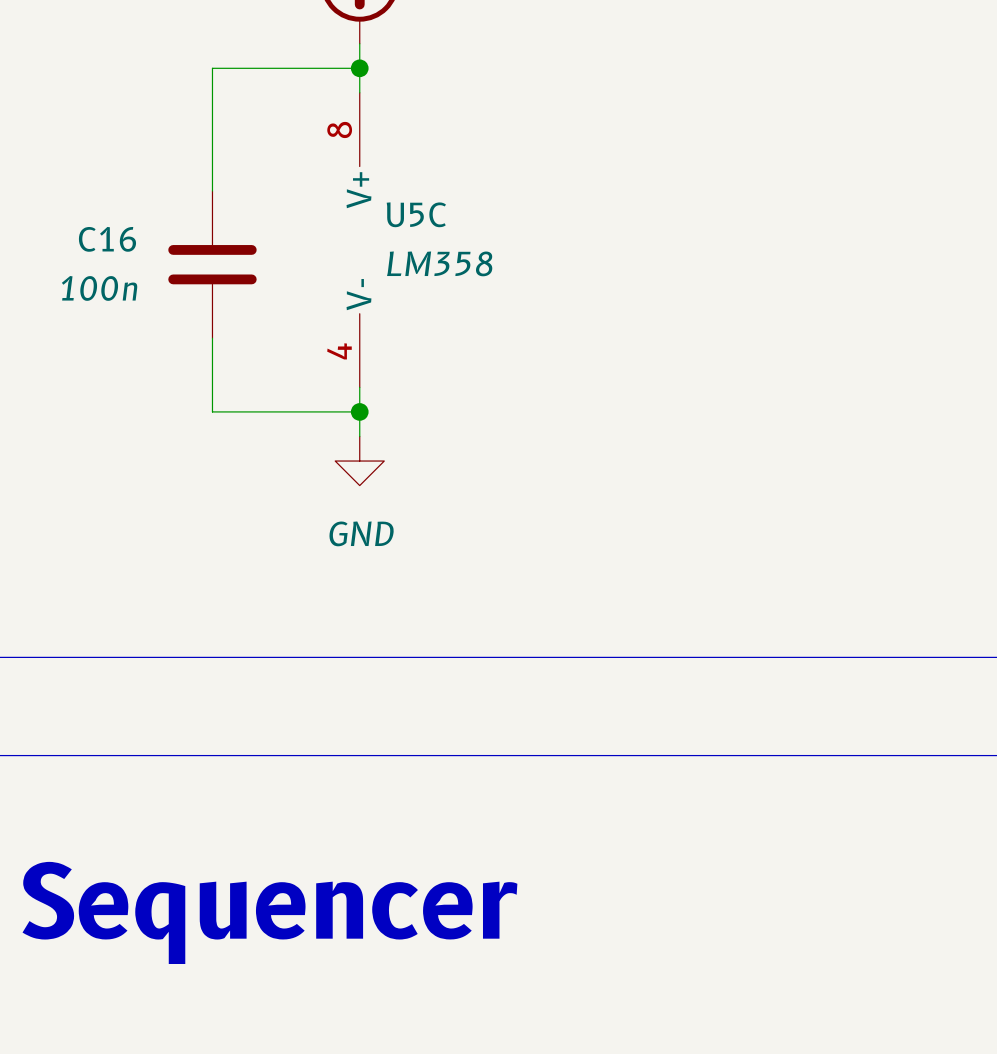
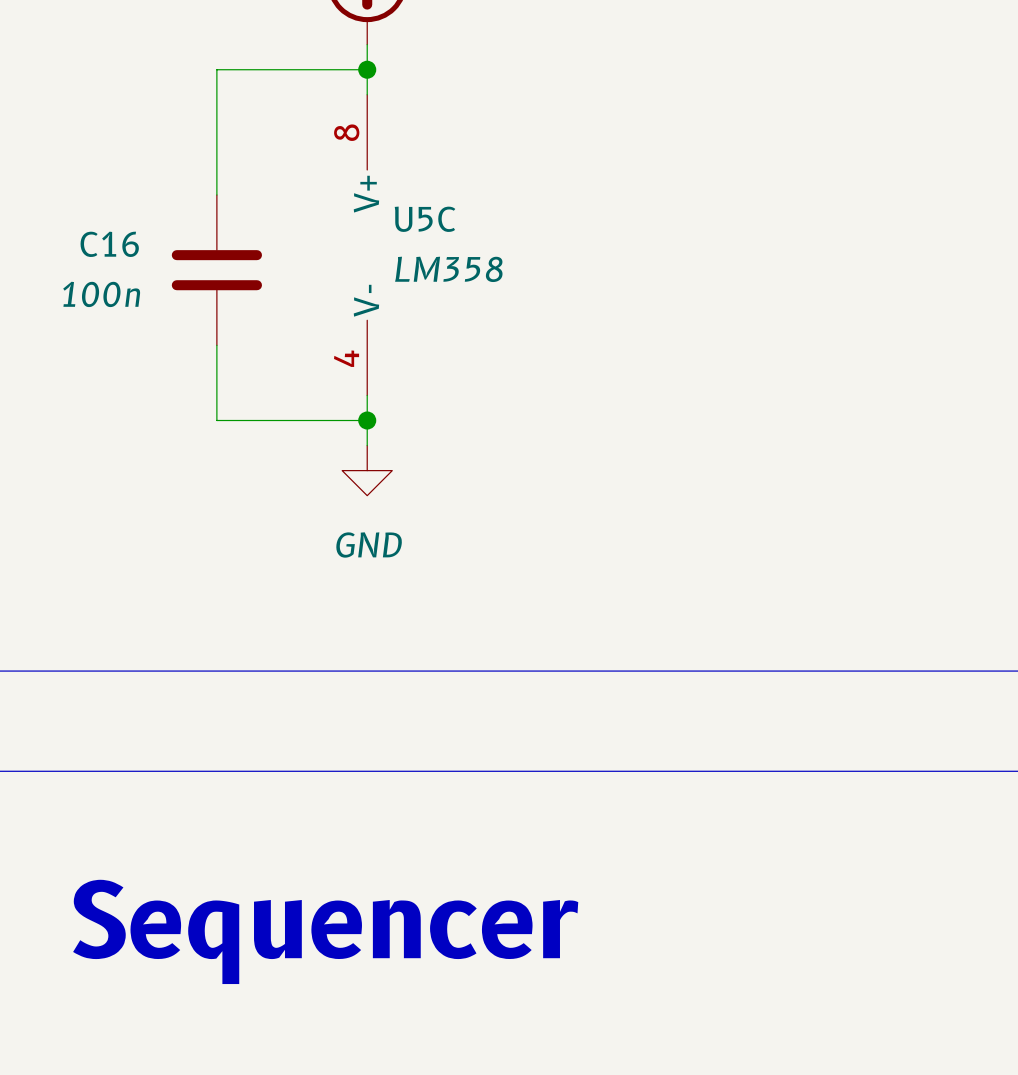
text position: Sequencer (269, 912) -> Sequencer (325, 931)

